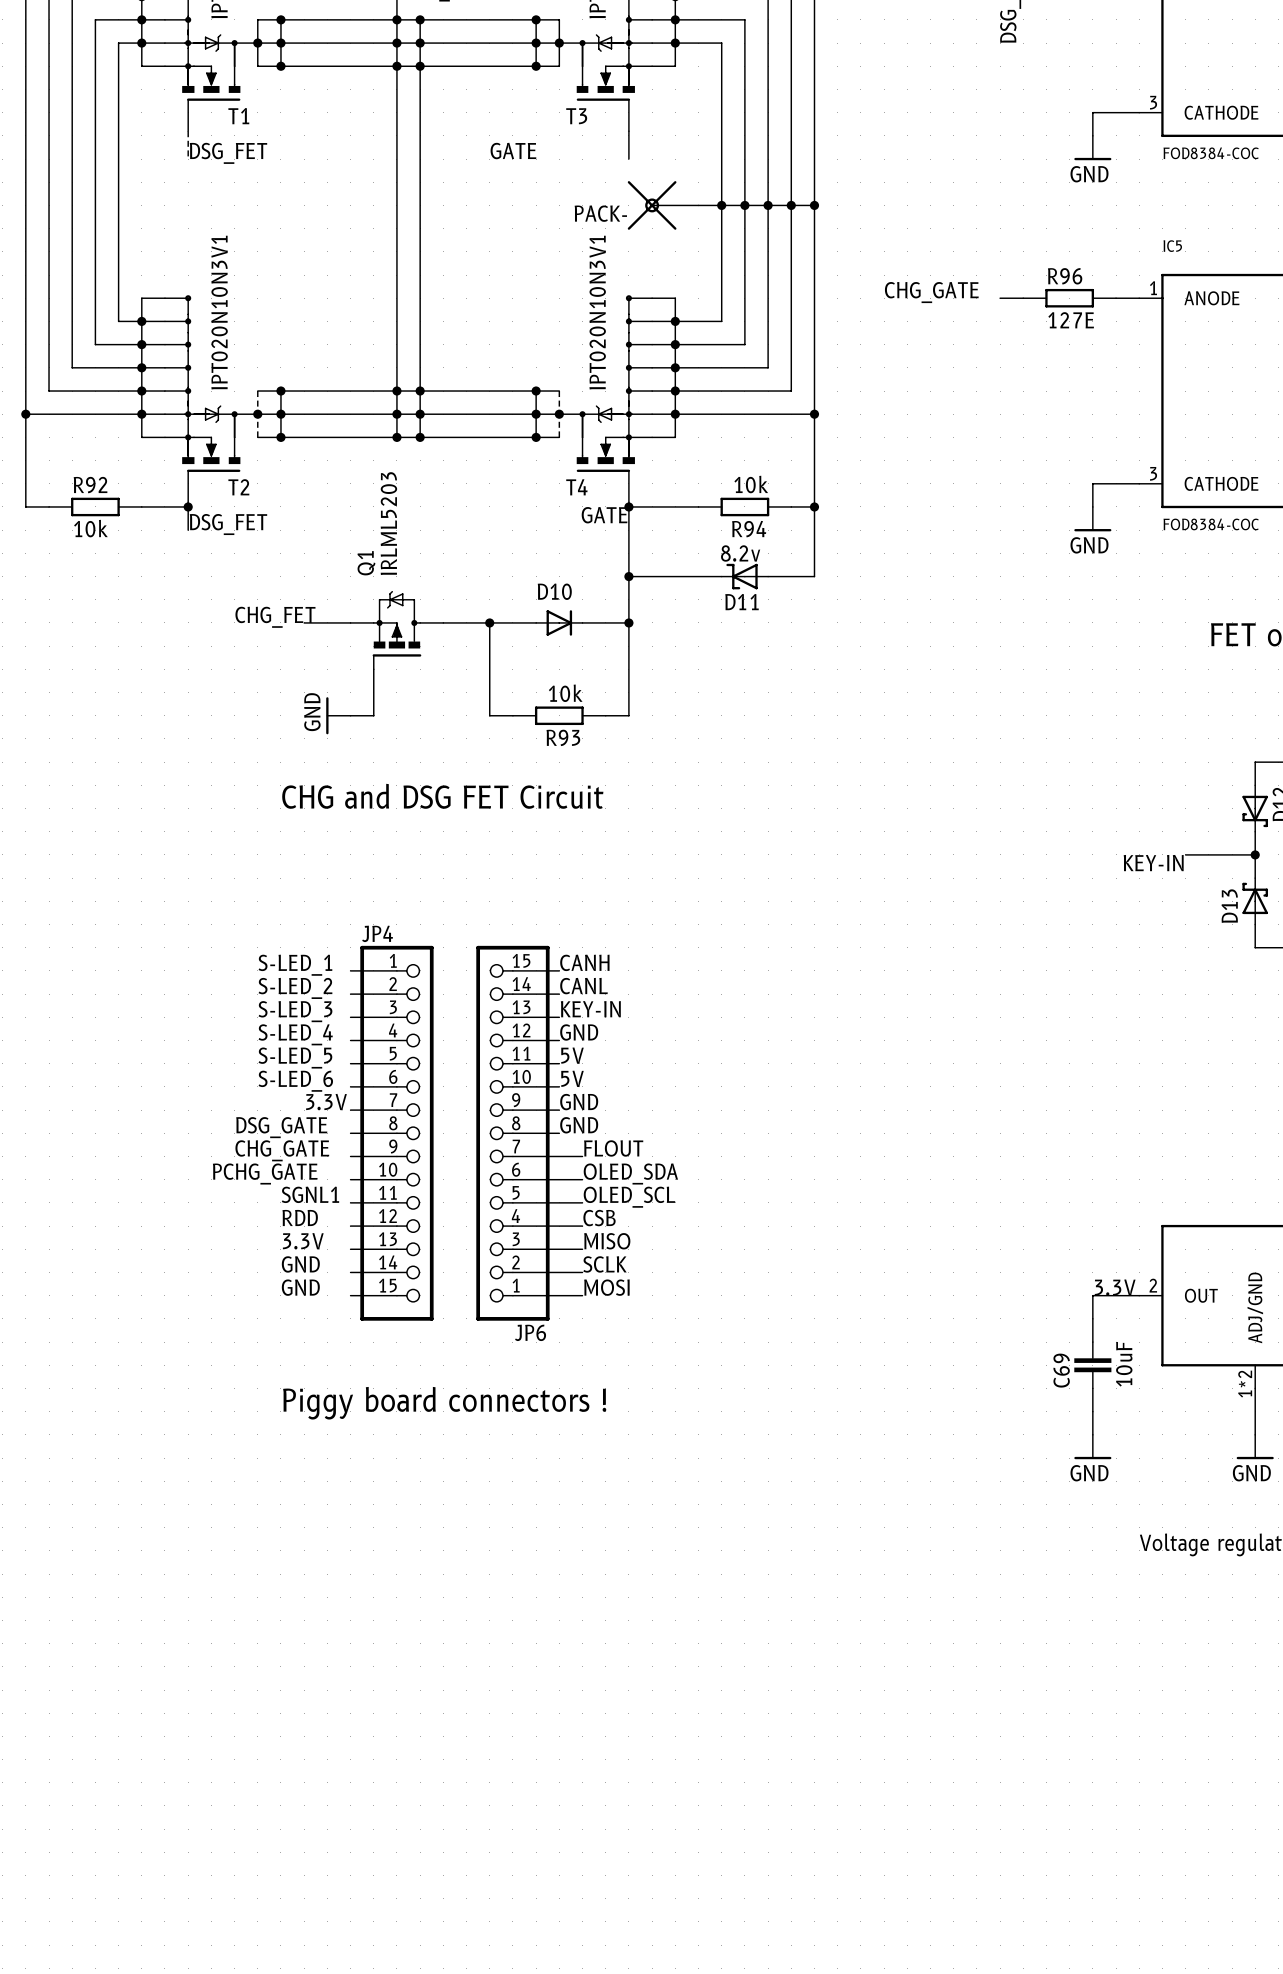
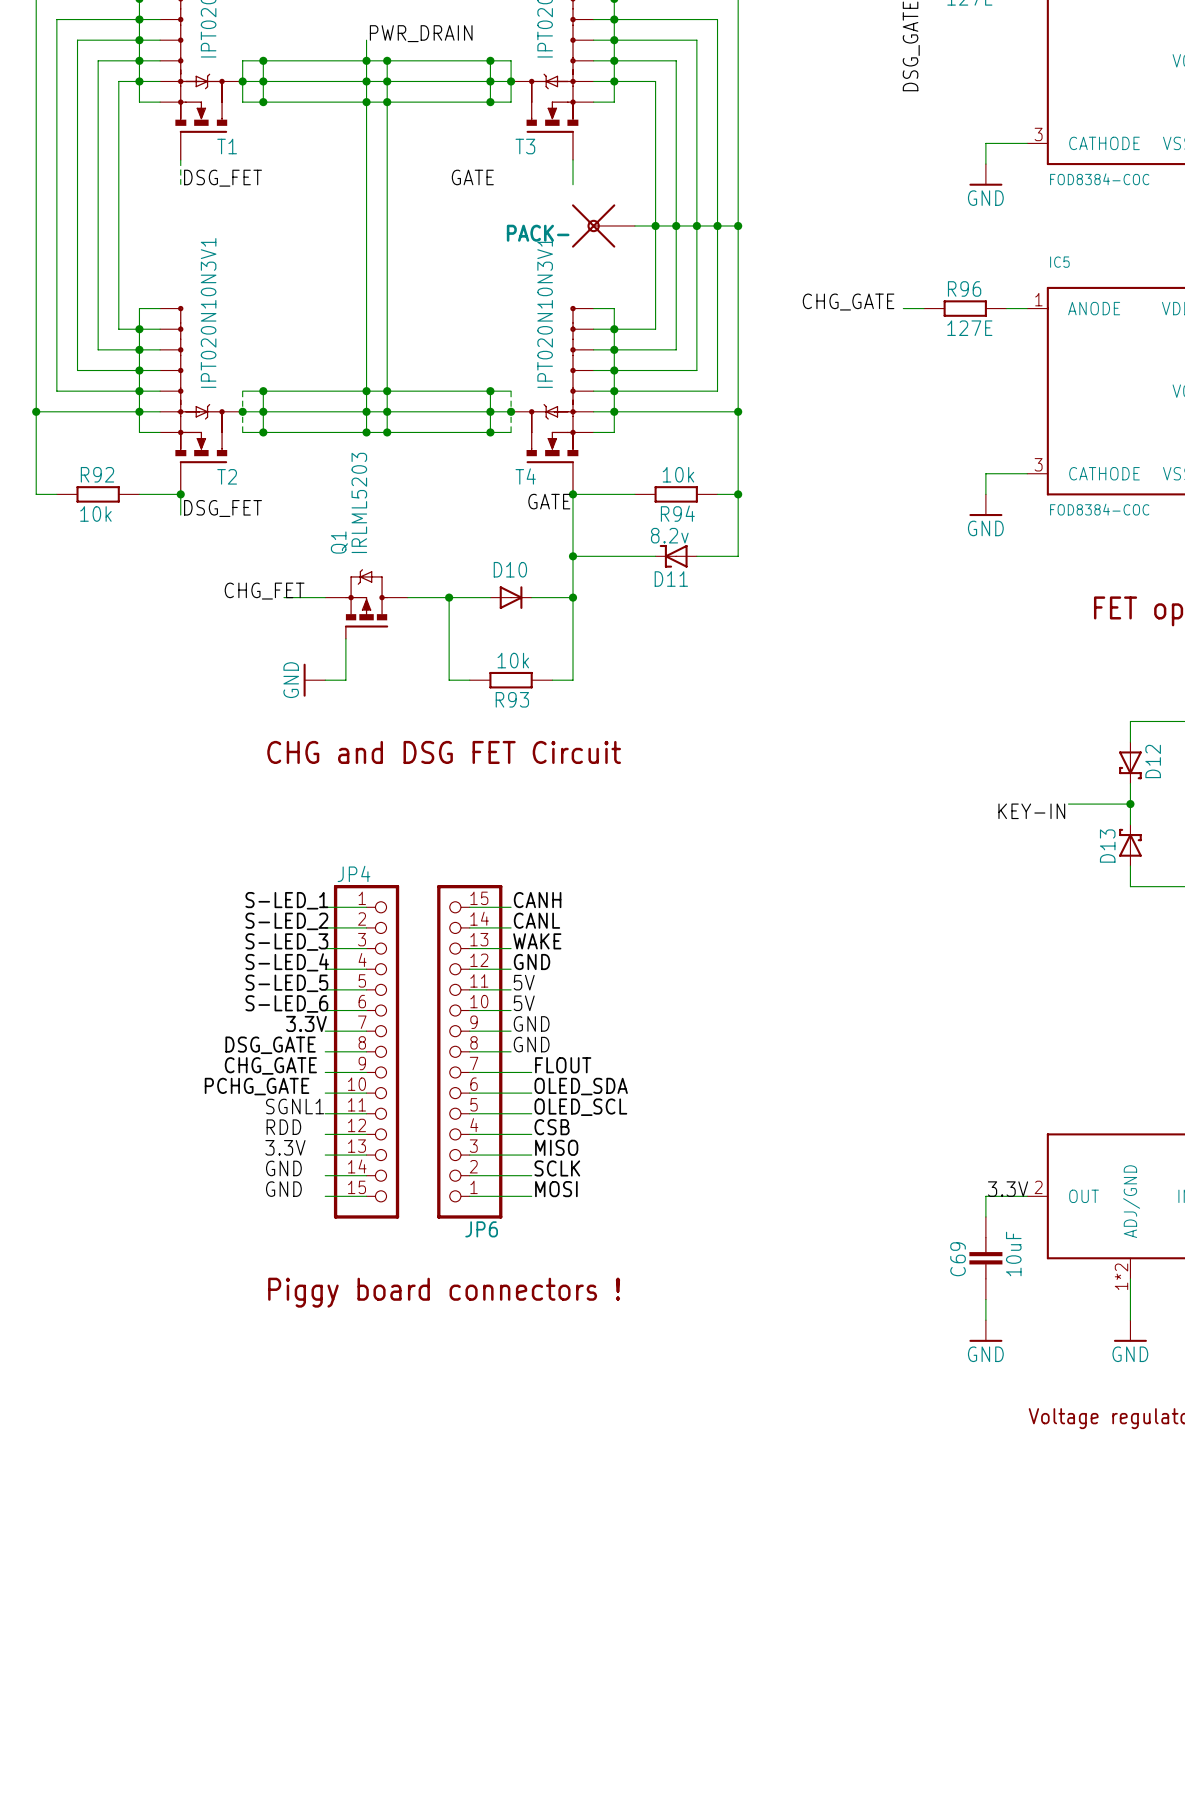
label: KEY-IN (590, 1009) -> WAKE (537, 941)

